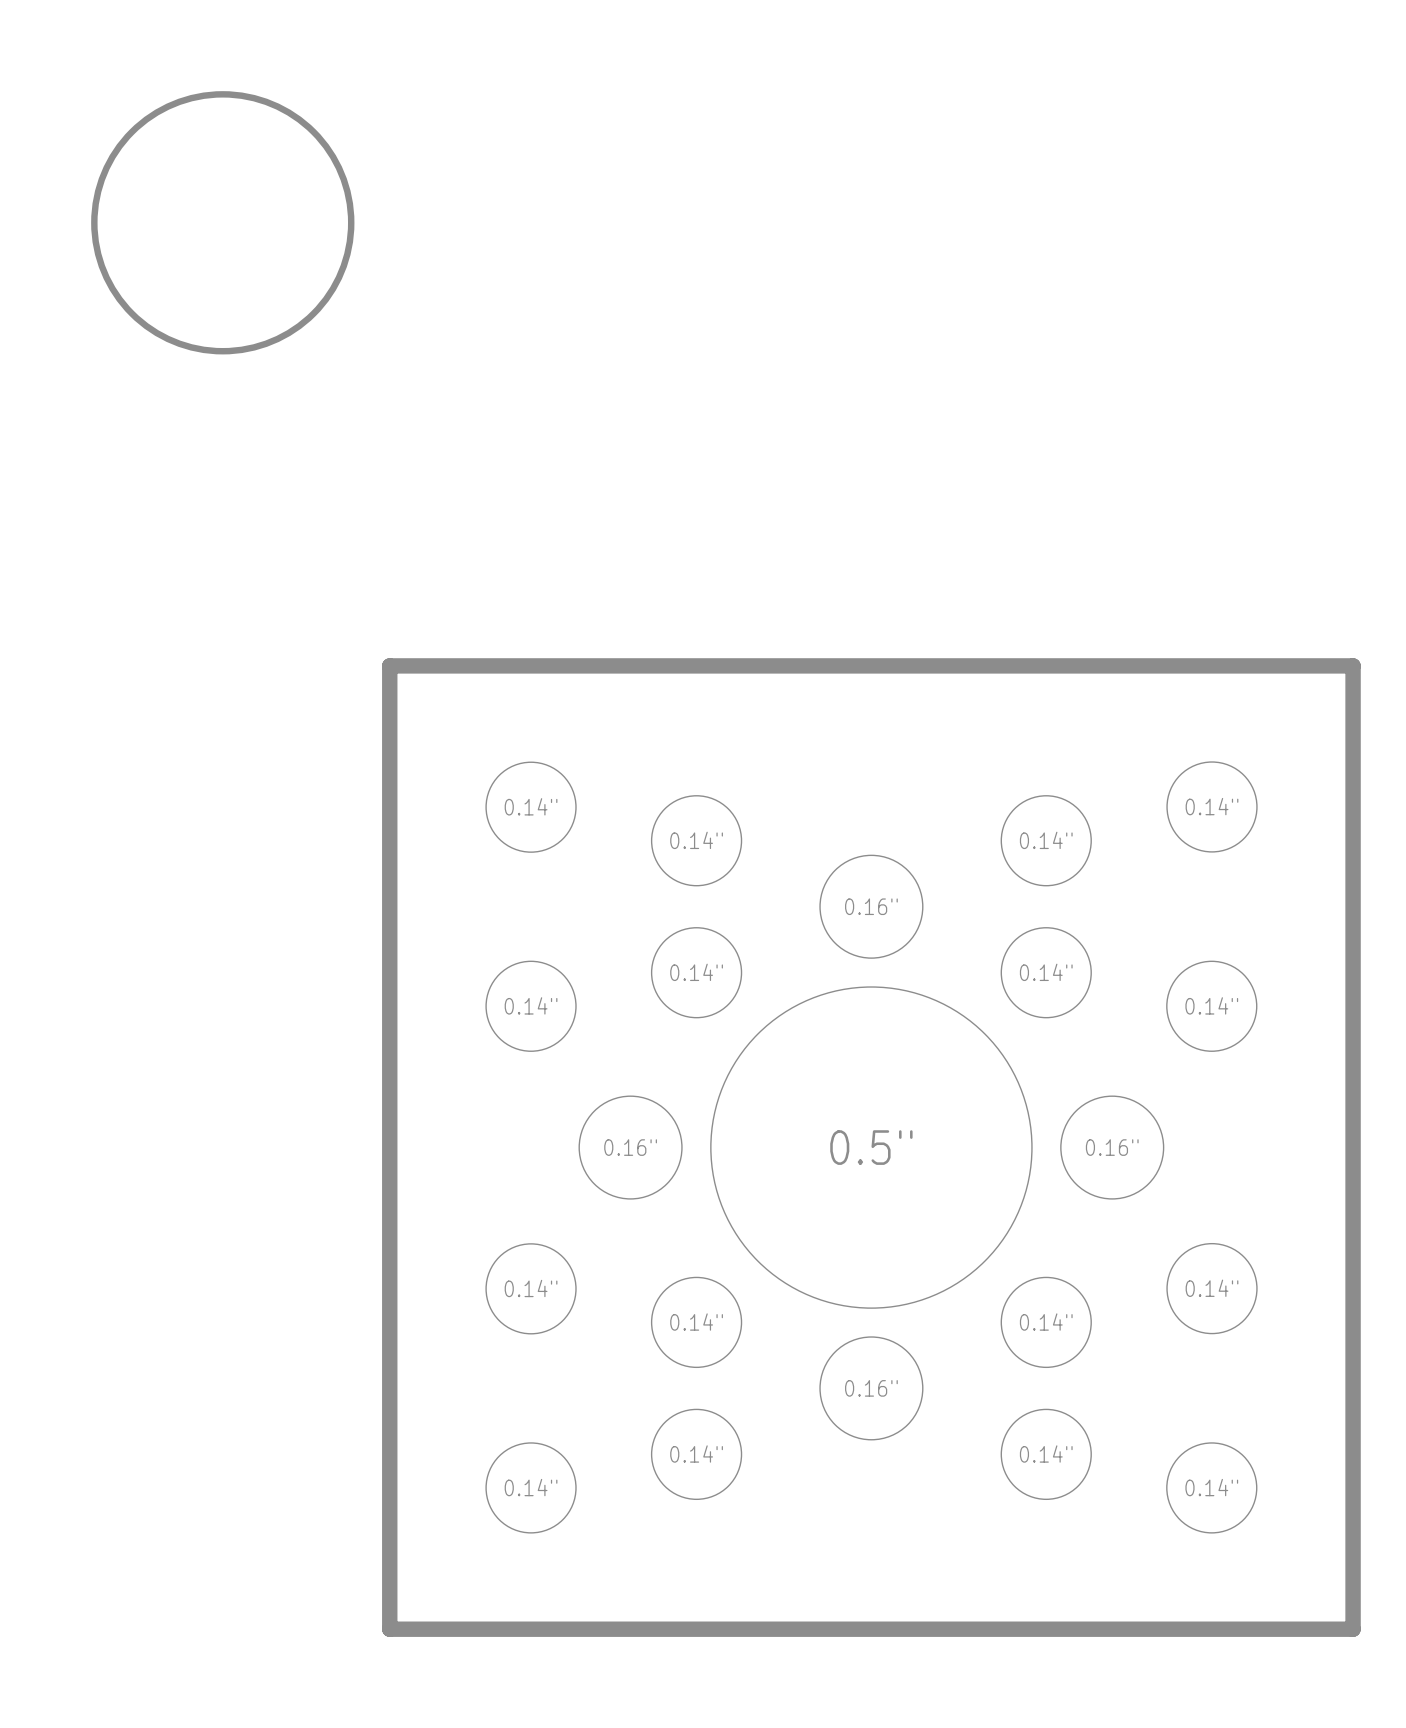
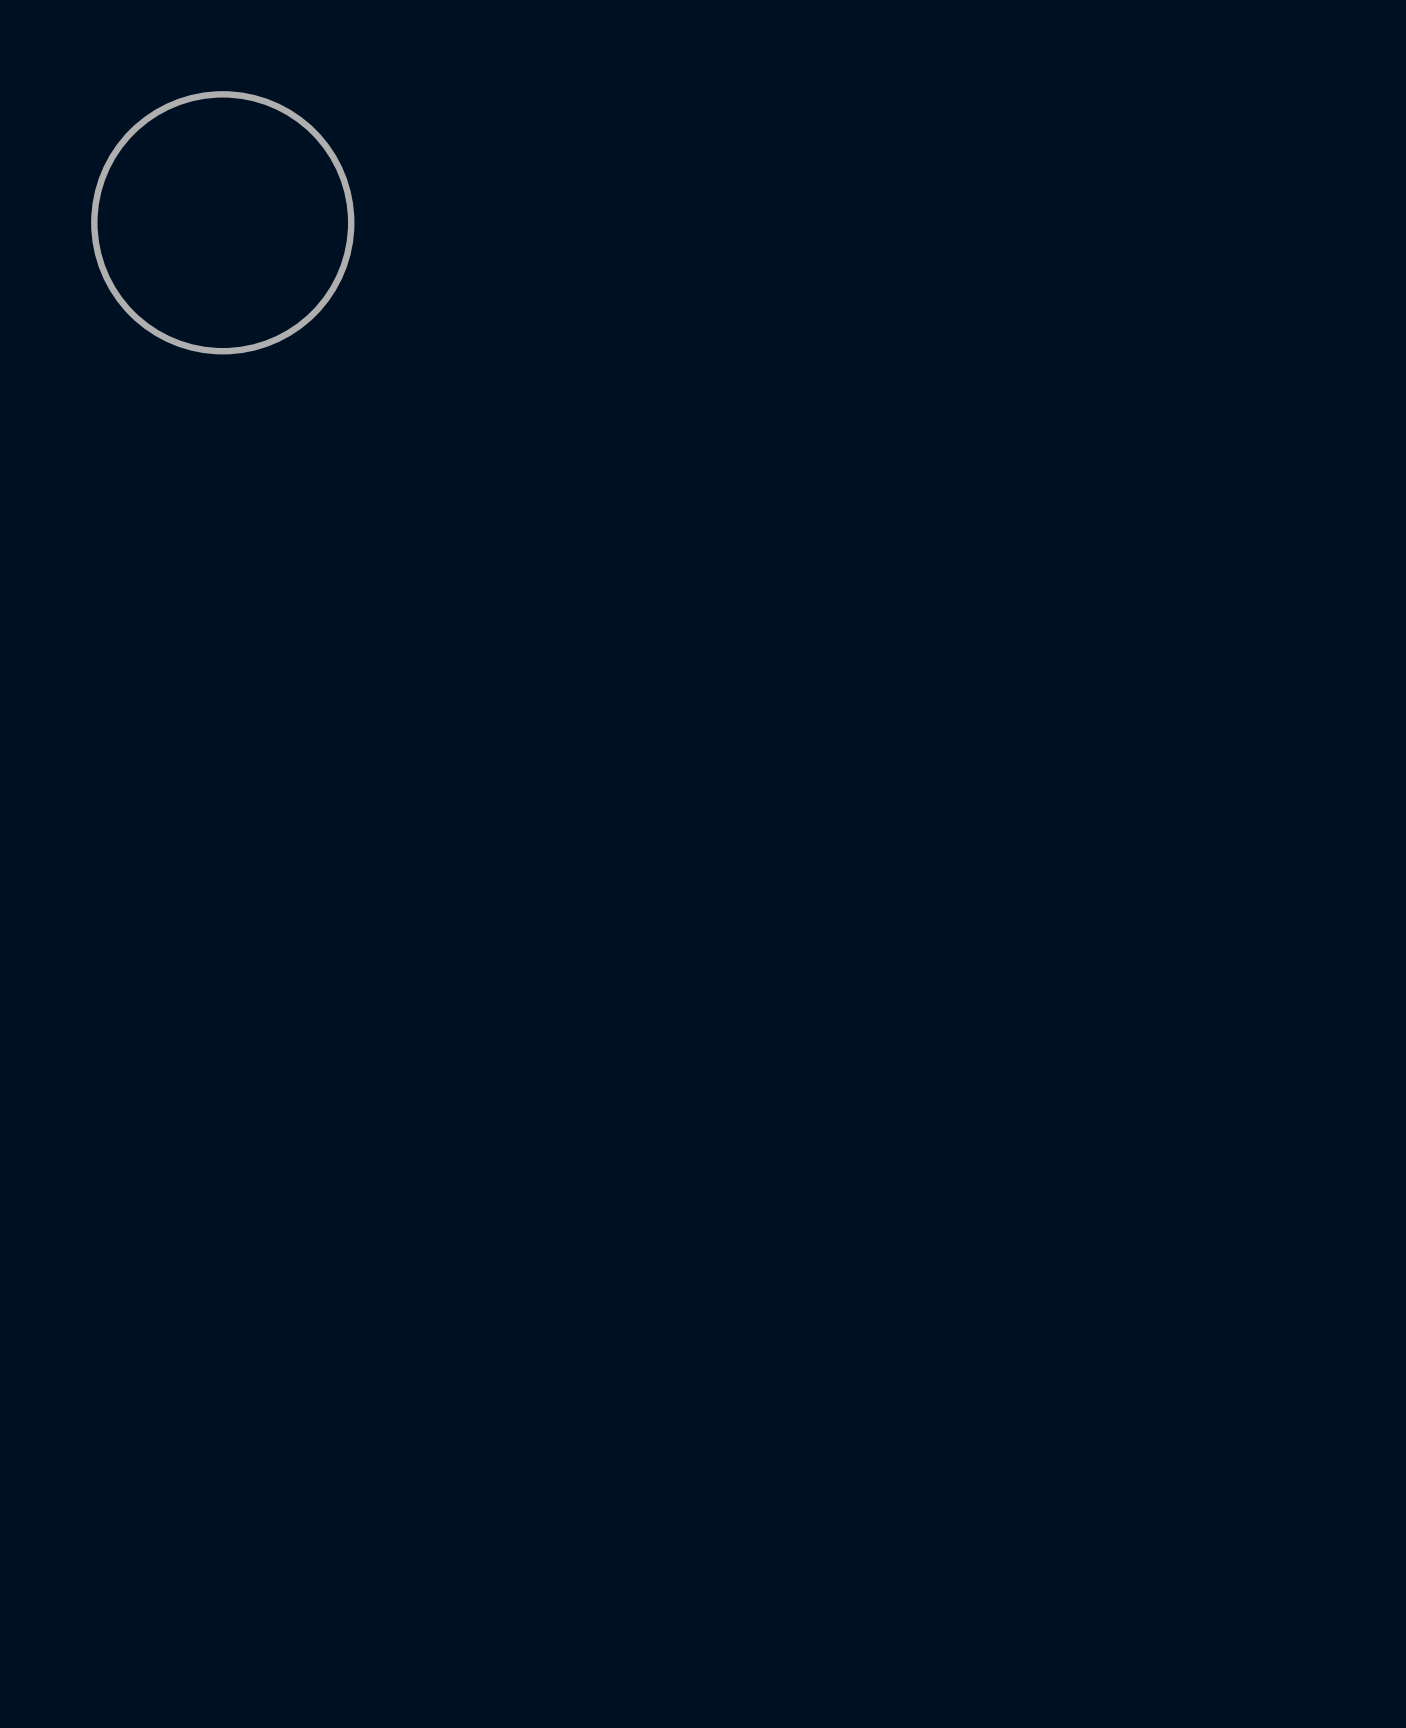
drawing: [382, 658, 1361, 1637] -> none

